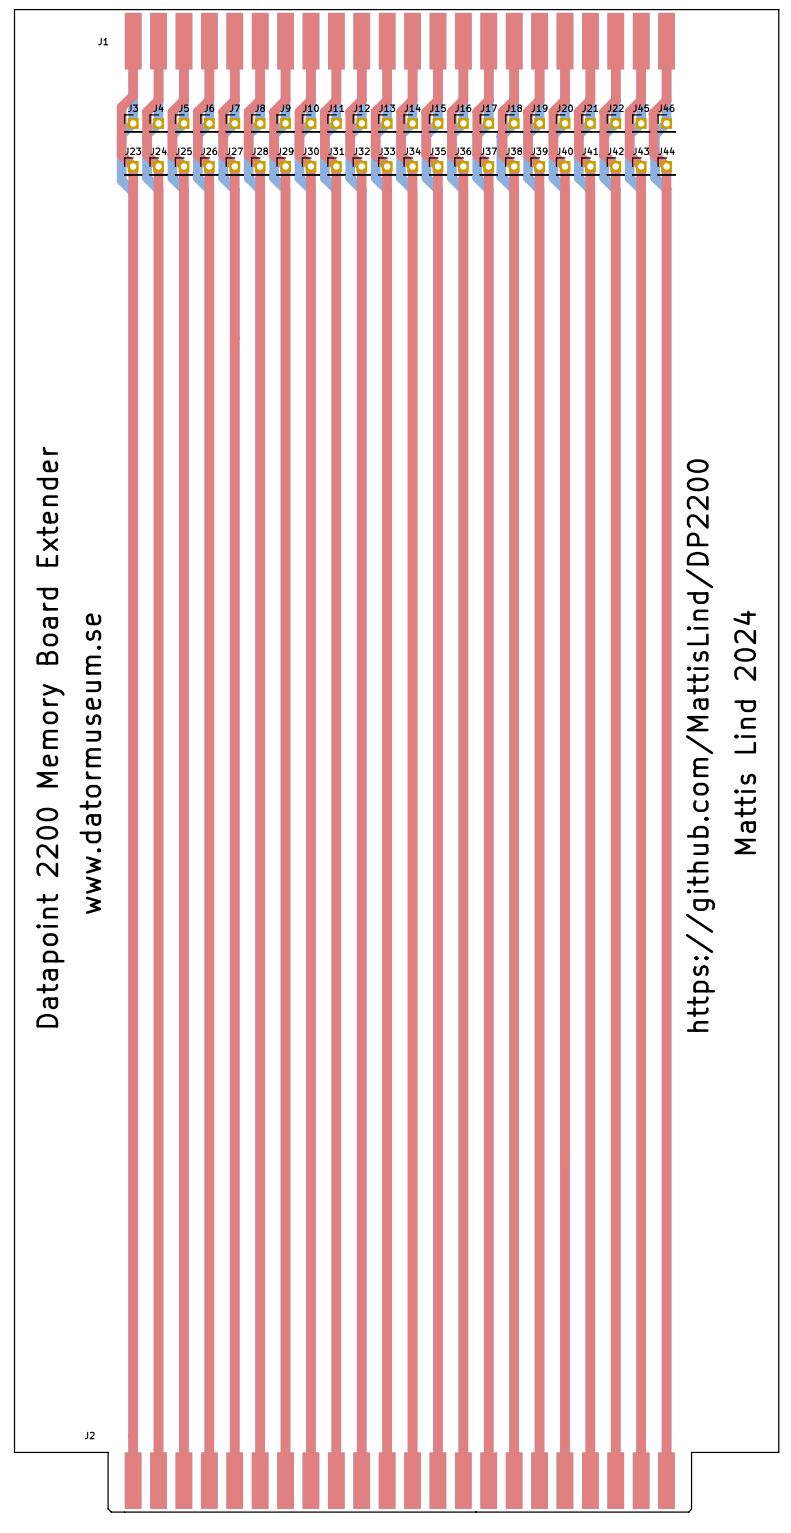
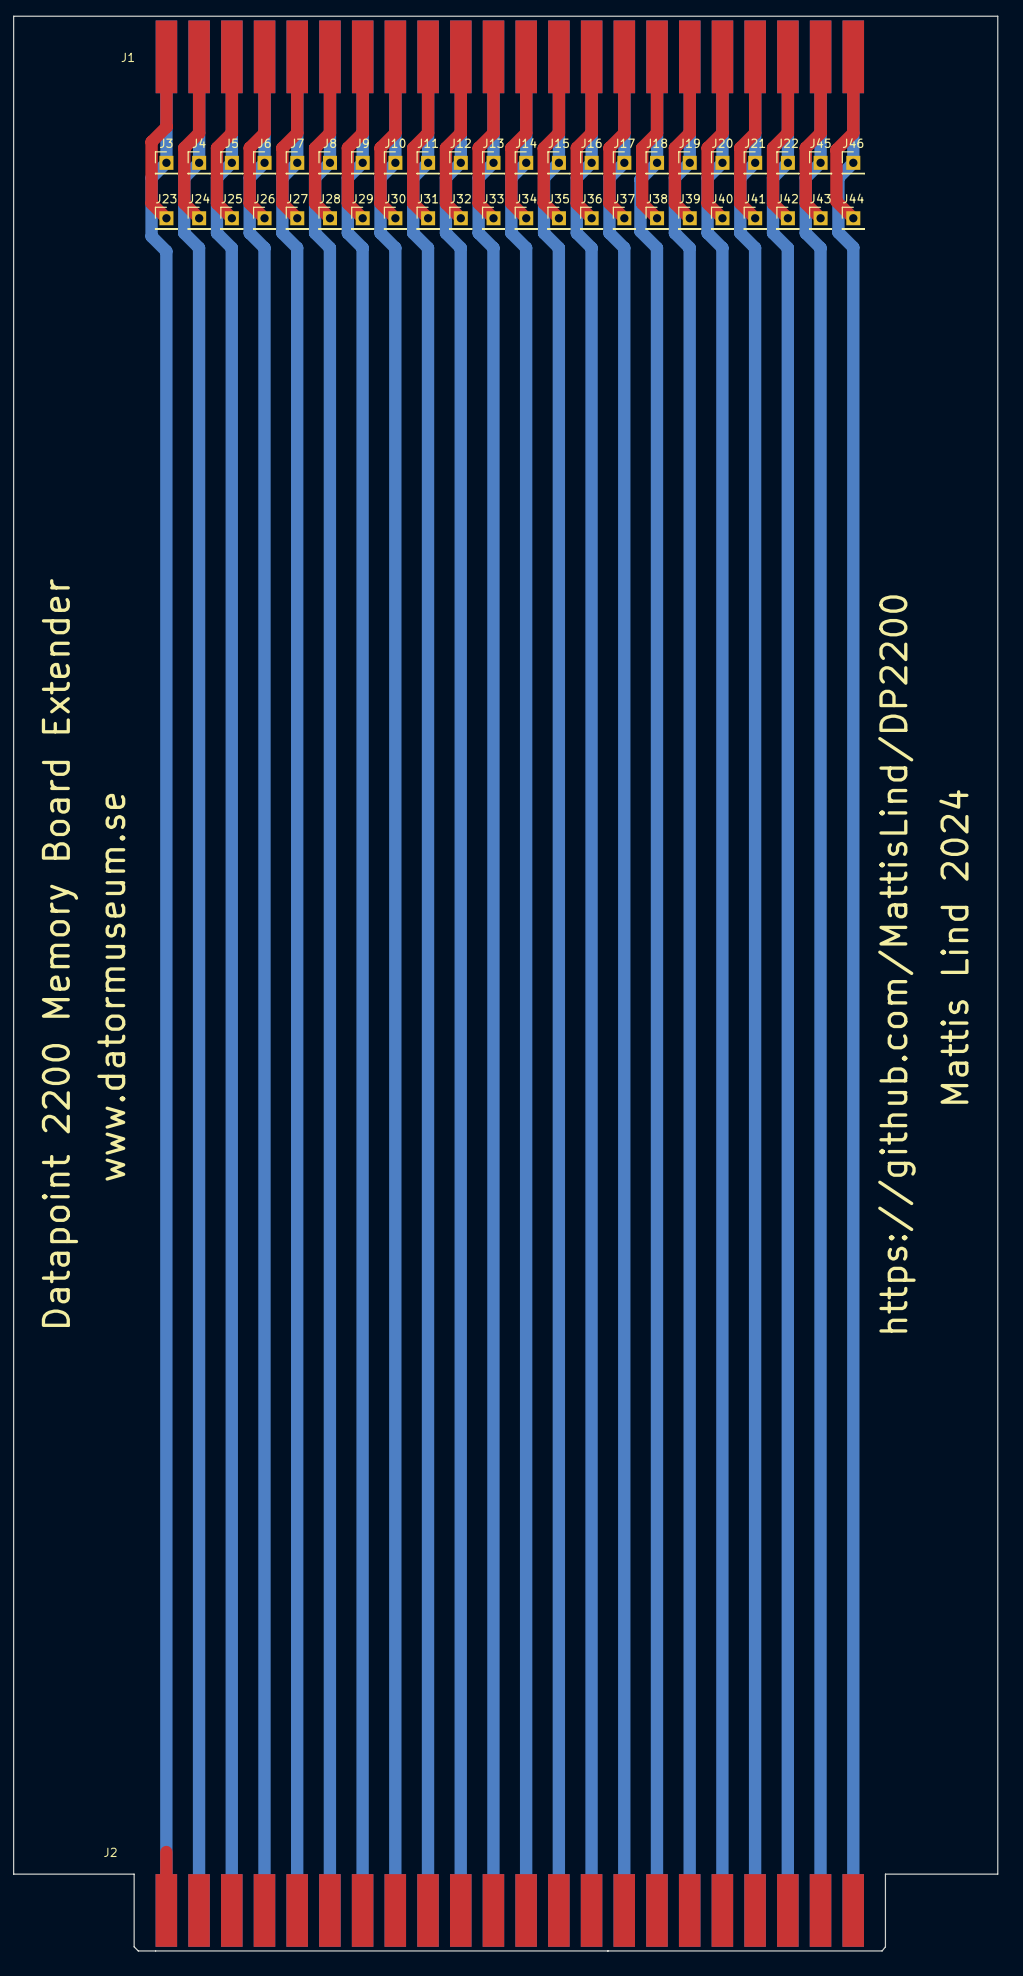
top track: (133, 166) (133, 1435) -> none
top track: (158, 166) (158, 1480) -> none
top track: (183, 166) (183, 1480) -> none
top track: (209, 166) (209, 1480) -> none
top track: (234, 166) (234, 337) -> none
top track: (260, 166) (260, 1480) -> none
top track: (285, 166) (285, 1480) -> none
top track: (310, 166) (310, 1480) -> none
top track: (336, 166) (336, 1480) -> none
top track: (361, 166) (361, 1480) -> none
top track: (387, 166) (387, 1480) -> none
top track: (412, 166) (412, 1480) -> none
top track: (437, 166) (437, 1480) -> none
top track: (463, 166) (463, 1480) -> none
top track: (488, 166) (488, 1480) -> none
top track: (514, 166) (514, 1480) -> none
top track: (539, 166) (539, 1480) -> none
top track: (564, 166) (564, 1160) -> none
top track: (590, 166) (590, 1480) -> none
top track: (615, 166) (615, 1480) -> none
top track: (641, 166) (641, 1480) -> none
top track: (666, 172) (666, 1480) -> none
top track: (234, 337) (234, 1480) -> none
top track: (564, 1160) (564, 1480) -> none

